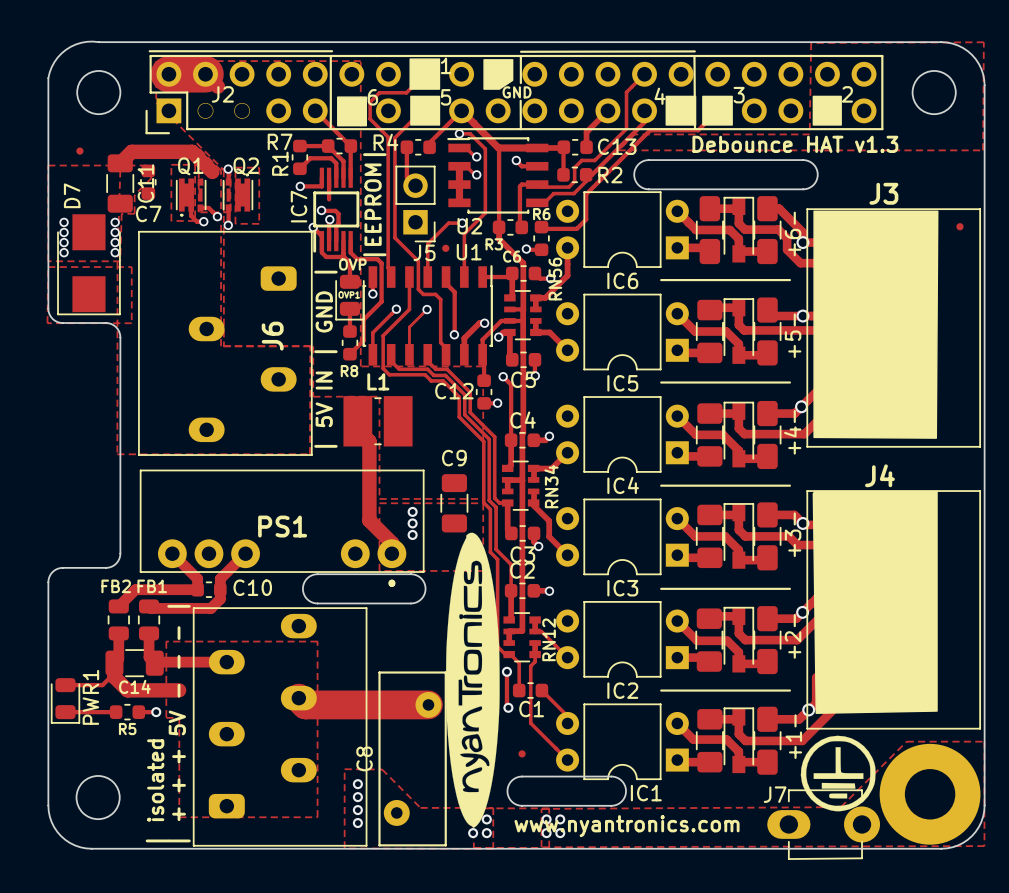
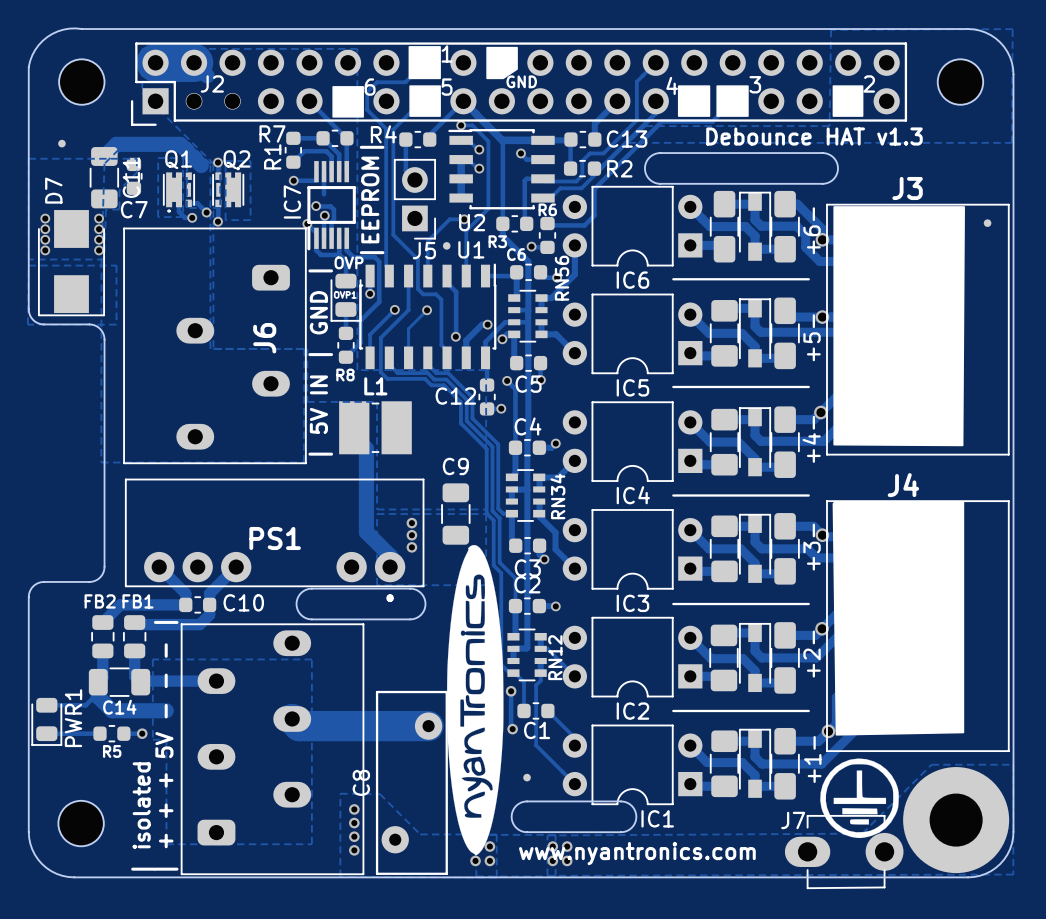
line: (149, 51) (332, 51) -> none
line: (694, 51) (521, 51) -> none
line: (520, 55) (520, 83) -> none
line: (330, 56) (330, 128) -> none
line: (694, 56) (695, 128) -> none
line: (520, 100) (520, 129) -> none

